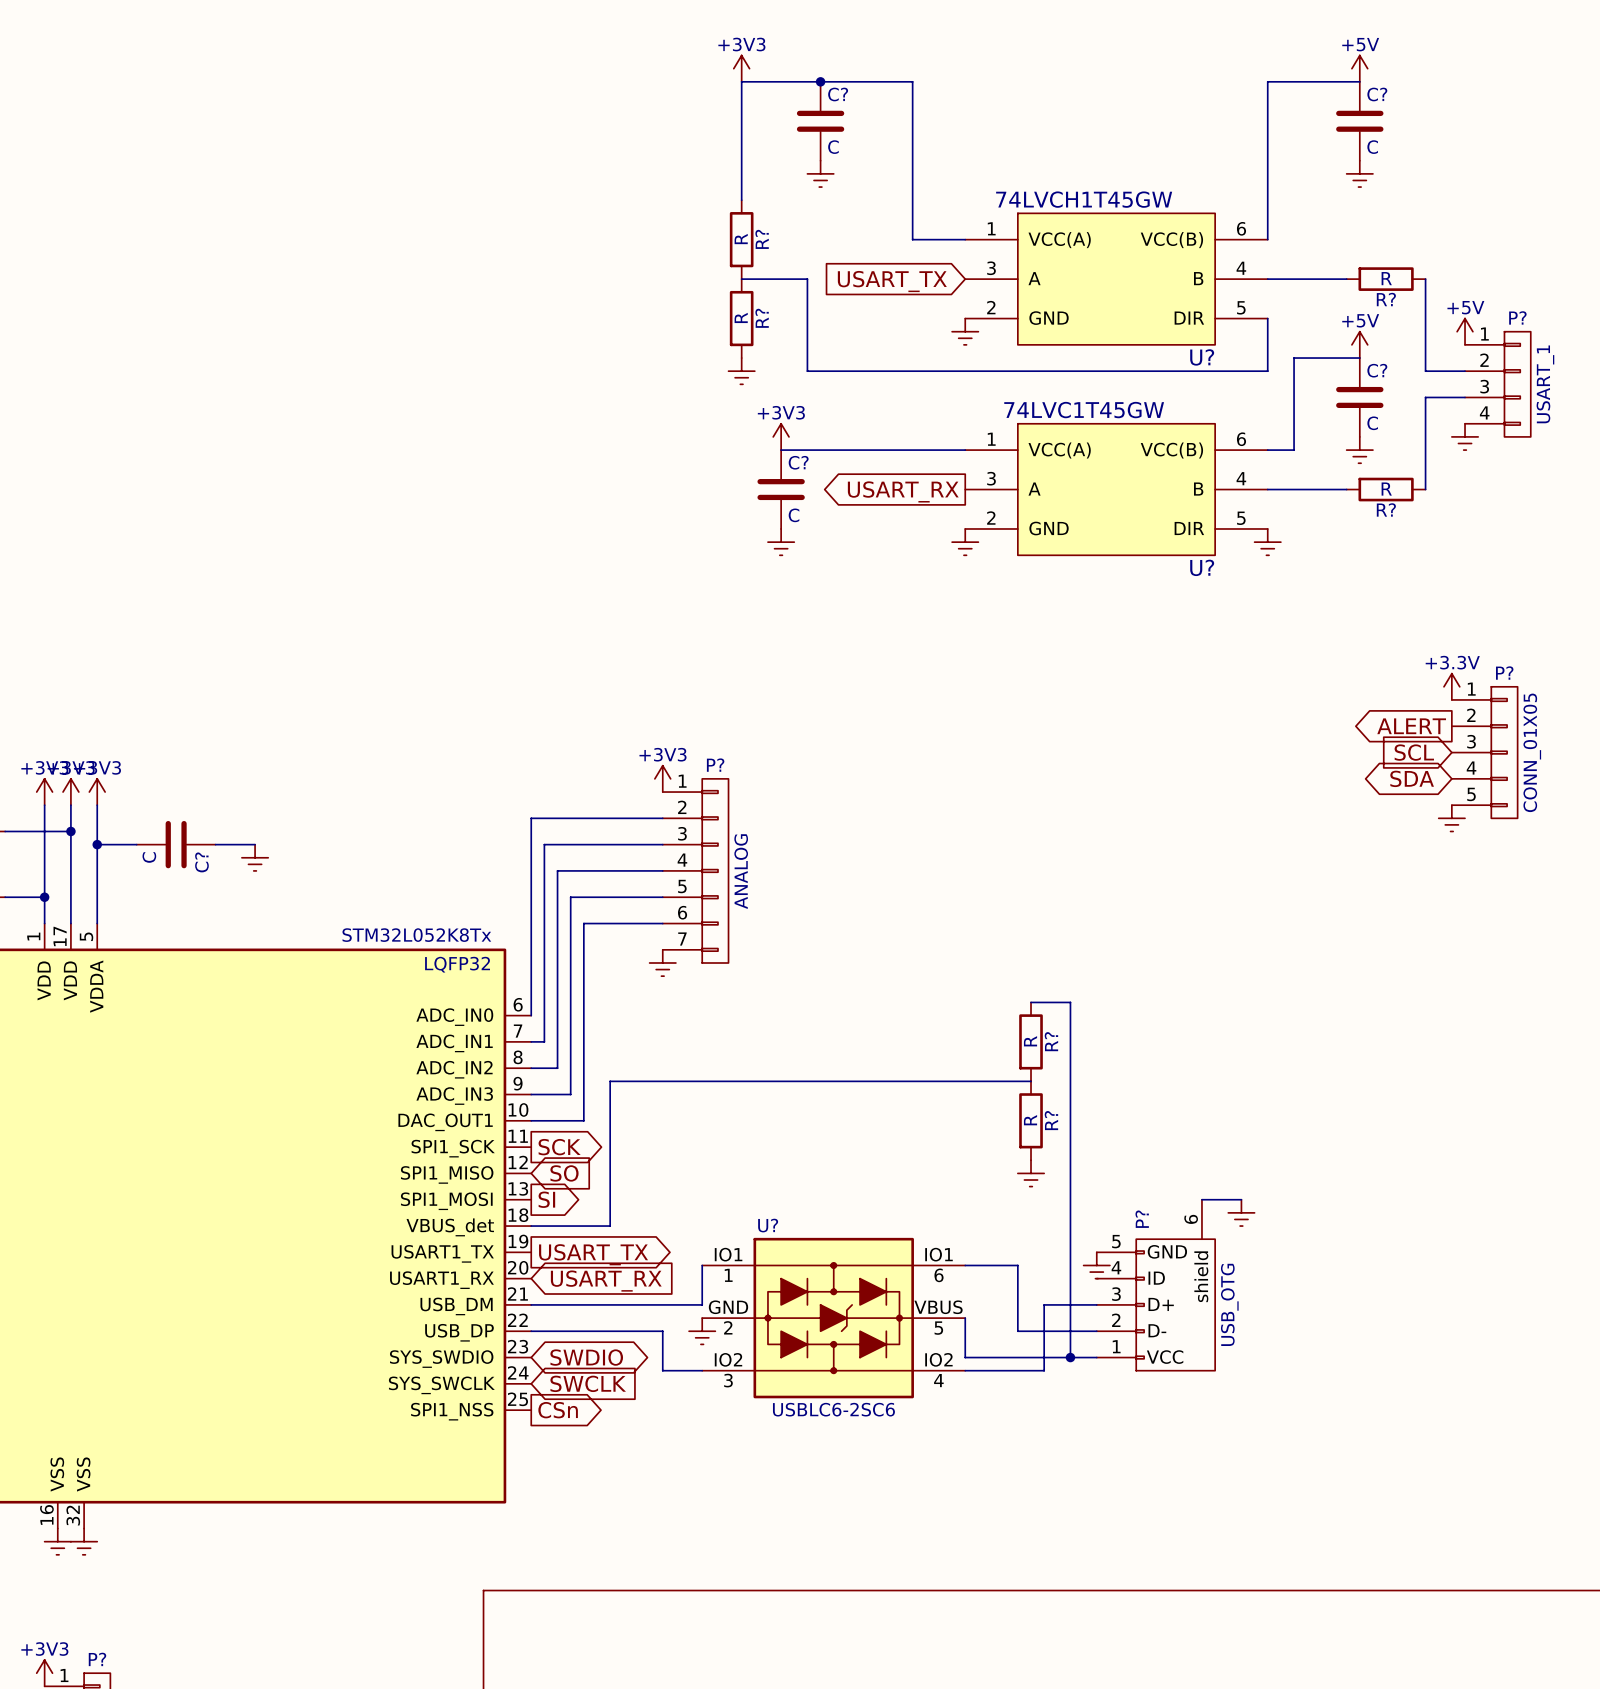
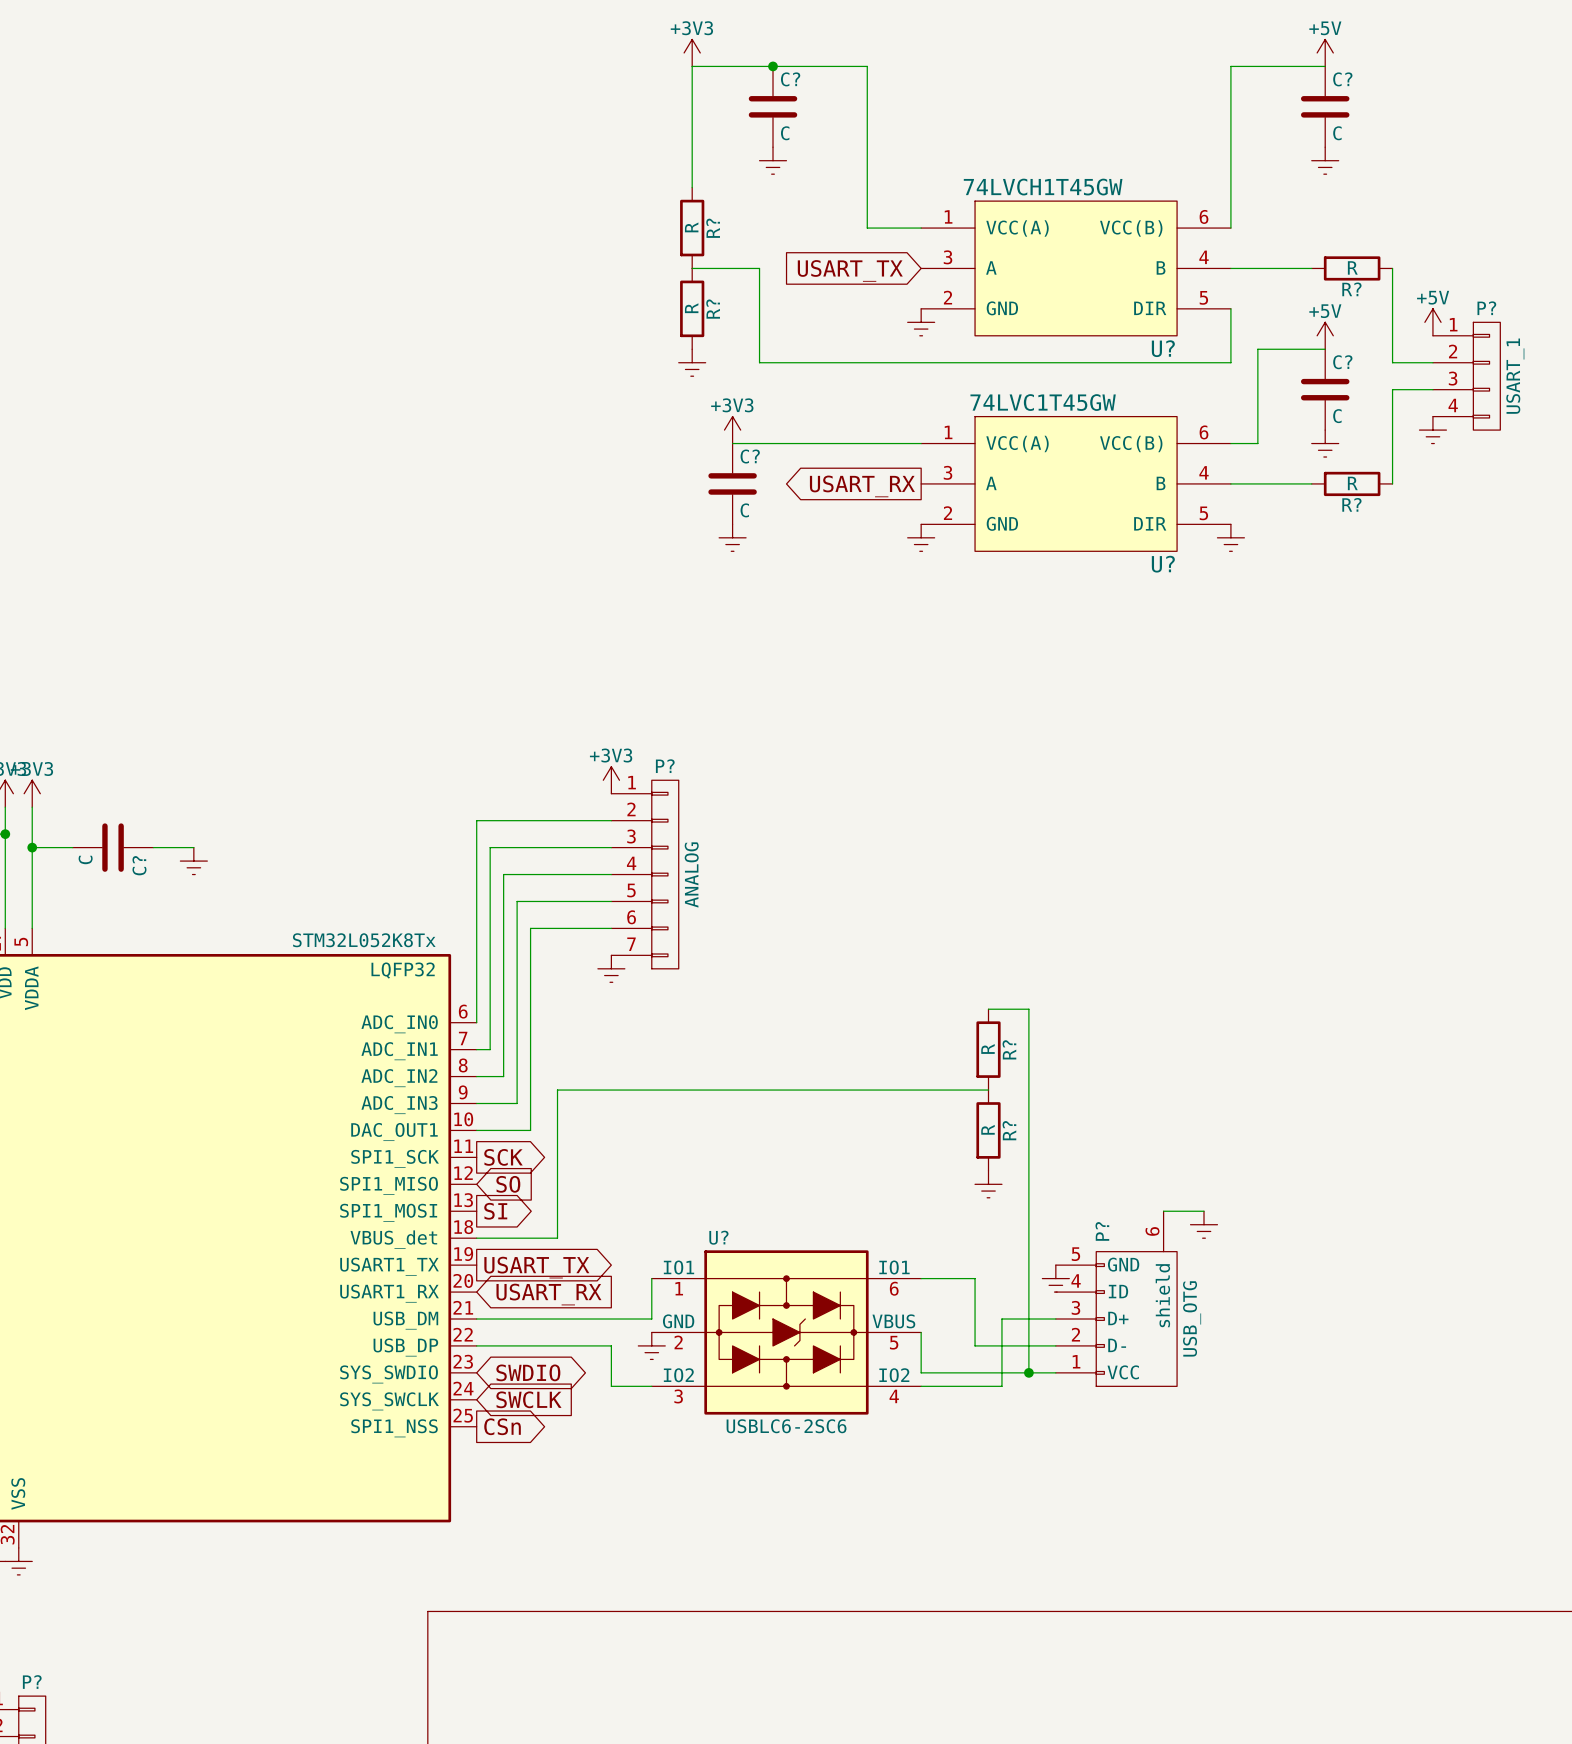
power symbol: +3.3V (1451, 686) -> none
global label: ALERT (1411, 726) -> none
global label: SCL (1414, 752) -> none
P?: CONN_01X05 (1484, 752) -> none
global label: SDA (1412, 778) -> none
power symbol: (1451, 818) -> none

